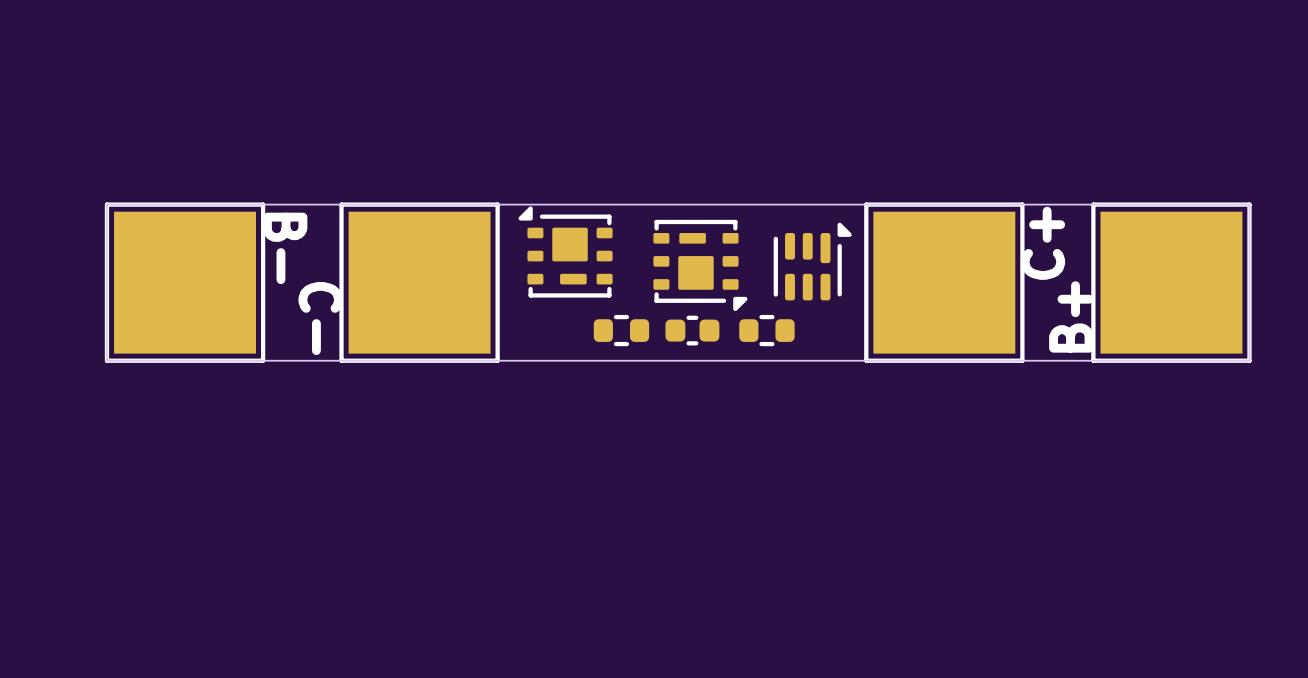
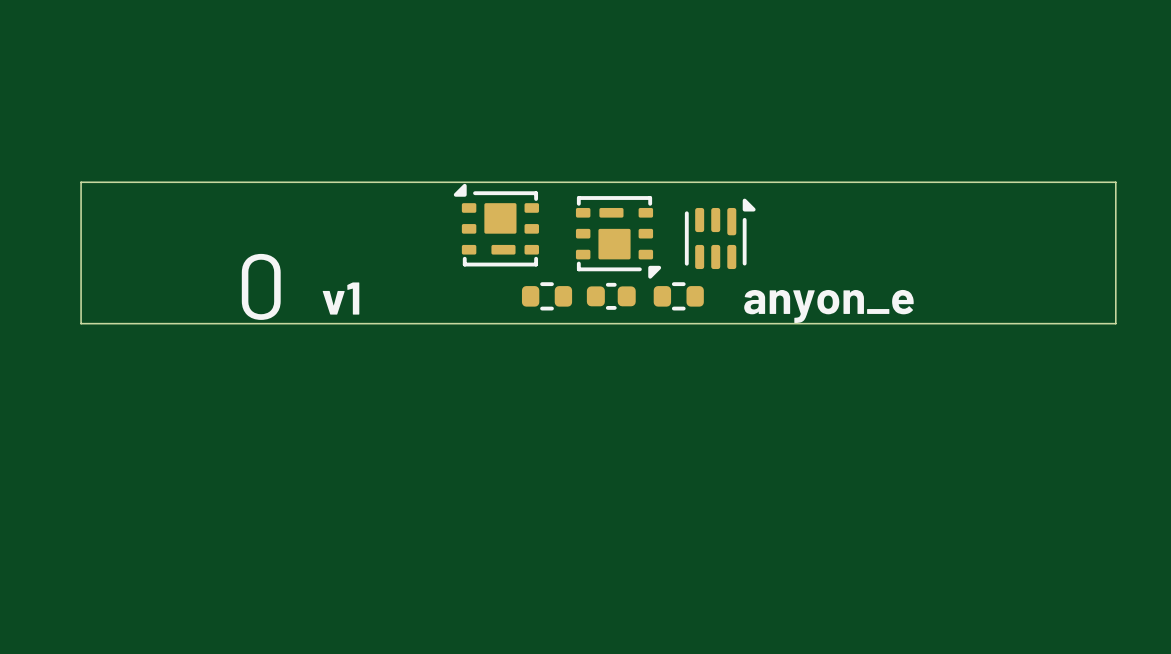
text: C+ (1042, 243) -> none
text: B- (285, 248) -> none
part: (185, 282) -> none
part: (419, 282) -> none
part: (944, 282) -> none
part: (1171, 282) -> none
text: B+ (1071, 316) -> none
text: C- (320, 318) -> none
text: none -> 0 (261, 286)
text: none -> v1 (341, 298)
text: none -> anyon_e (828, 306)

